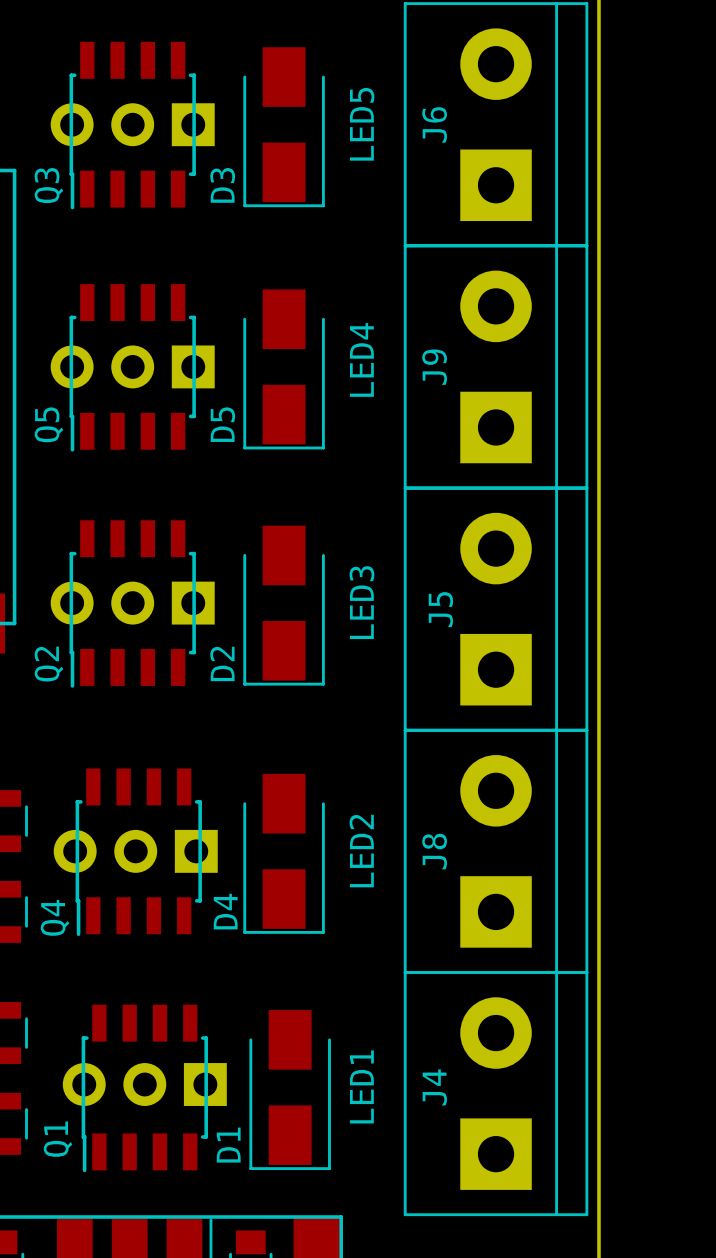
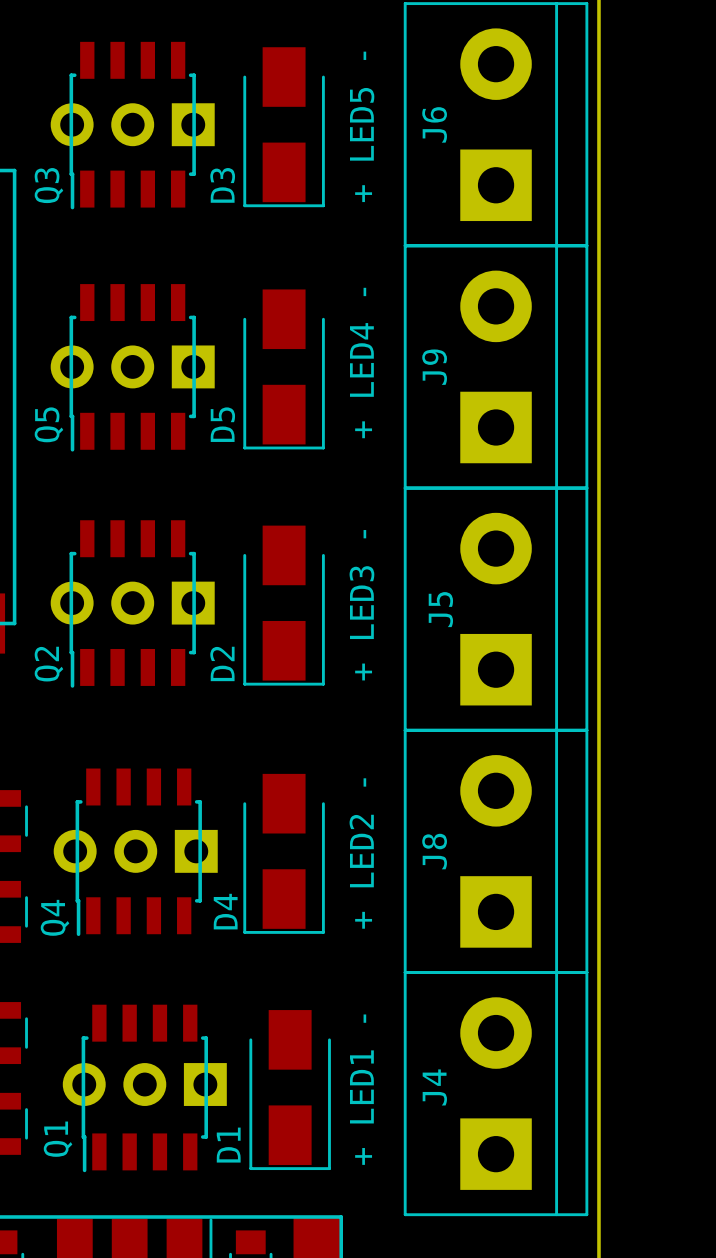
J6 value: LED5 (362, 124) -> + LED5 - (362, 126)
J9 value: LED4 (361, 359) -> + LED4 - (361, 363)
J5 value: LED3 (361, 602) -> + LED3 - (361, 605)
J8 value: LED2 (361, 851) -> + LED2 - (361, 853)
J4 value: LED1 (361, 1086) -> + LED1 - (361, 1089)

